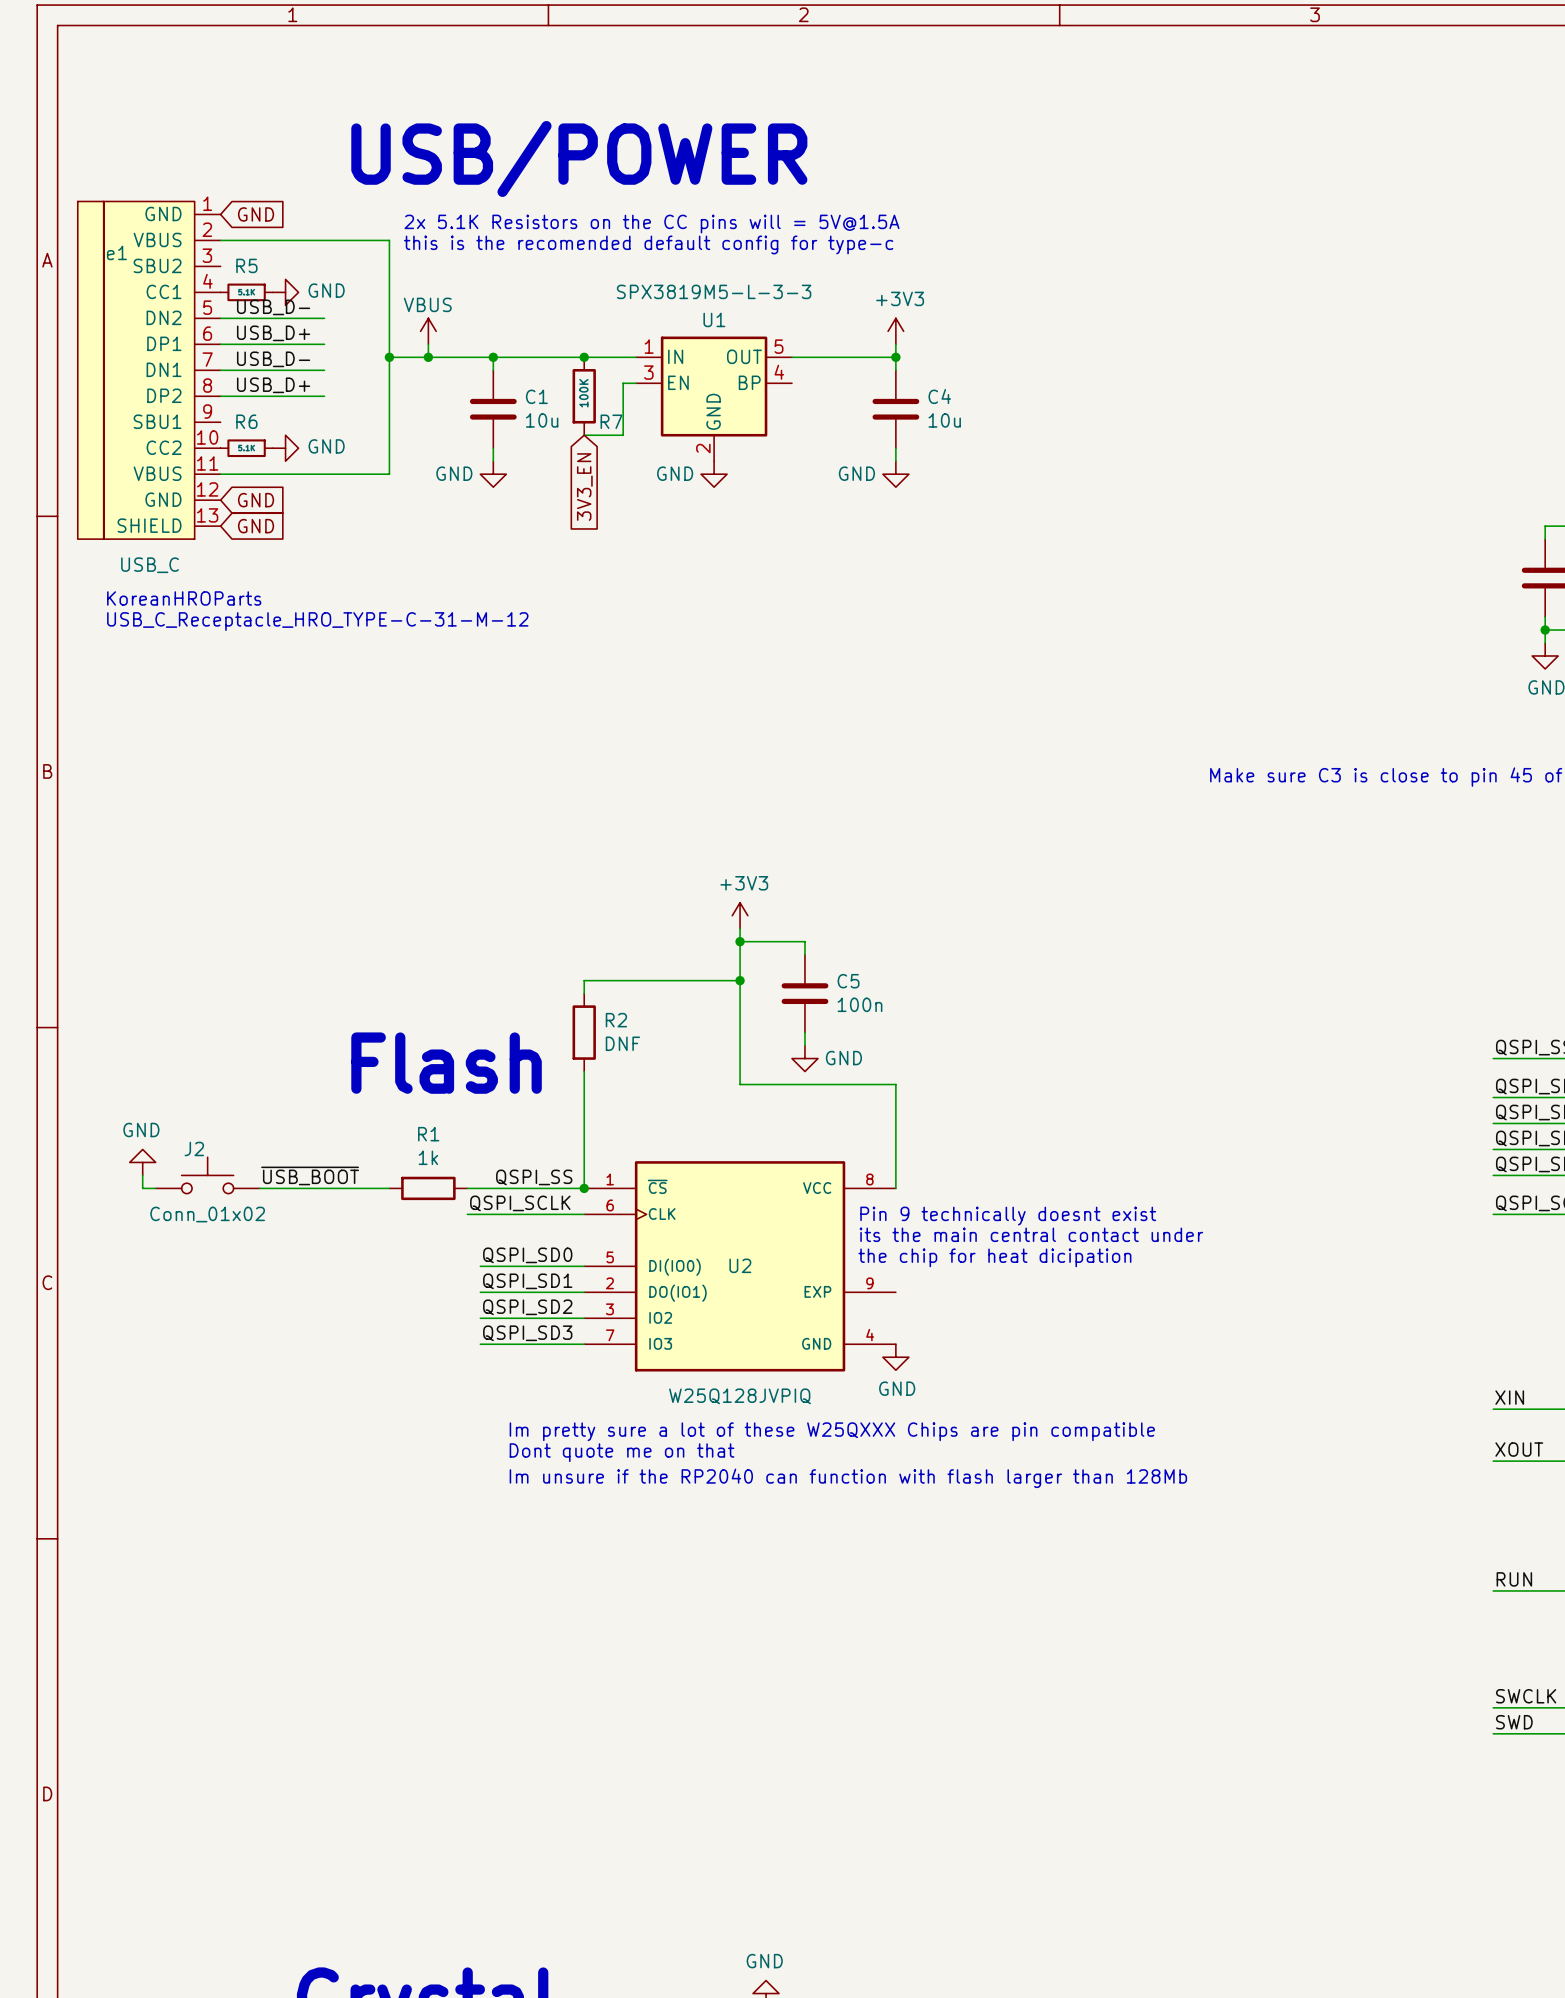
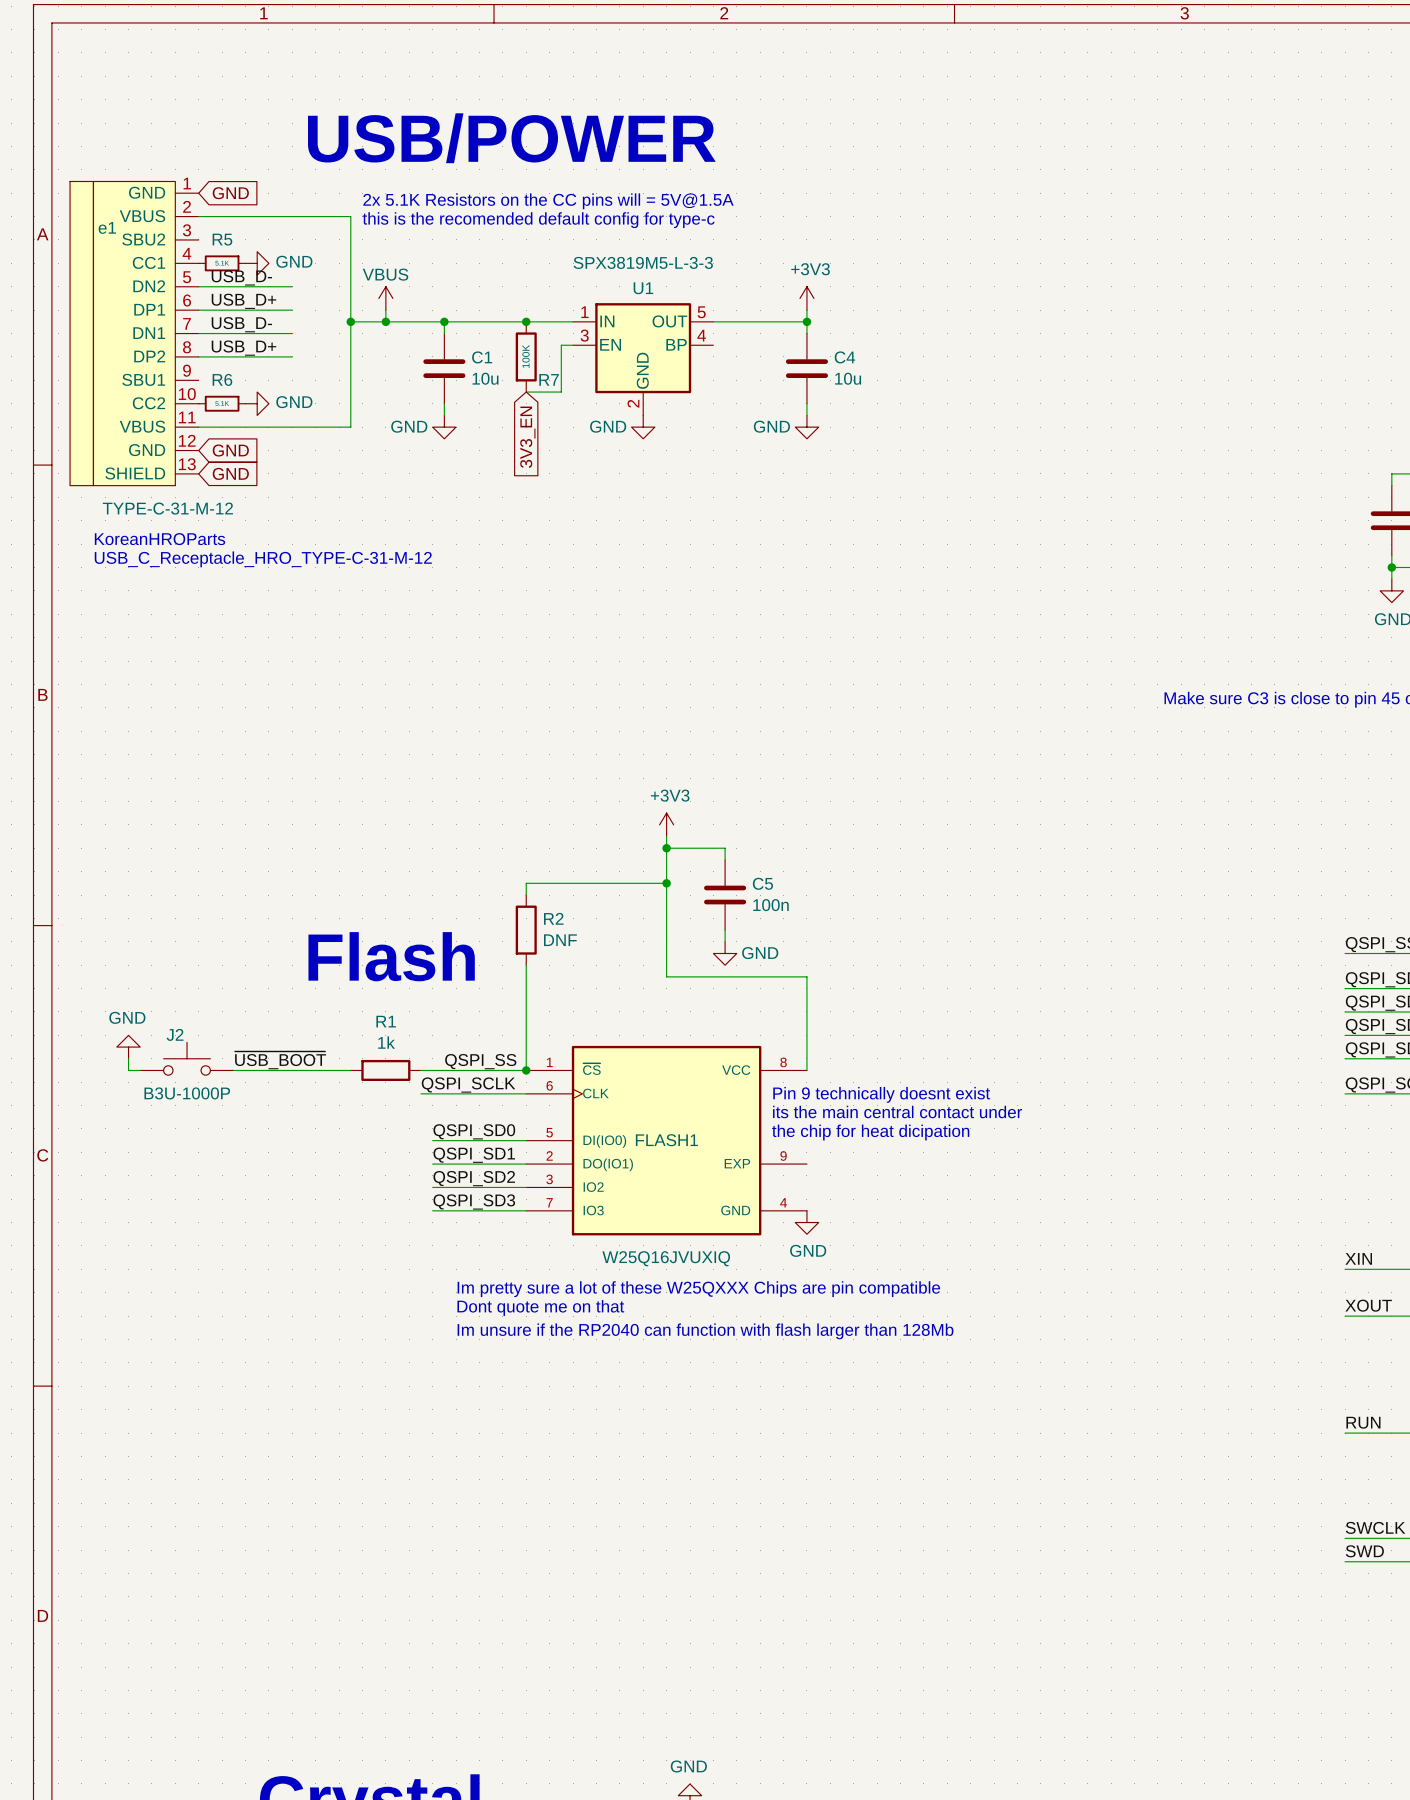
e1 value: USB_C (150, 565) -> TYPE-C-31-M-12 (167, 508)
J2 value: Conn_01x02 (207, 1214) -> B3U-1000P (187, 1093)
U2 name: U2 (740, 1265) -> FLASH1 (666, 1140)
U2 value: W25Q128JVPIQ (740, 1396) -> W25Q16JVUXIQ (666, 1258)

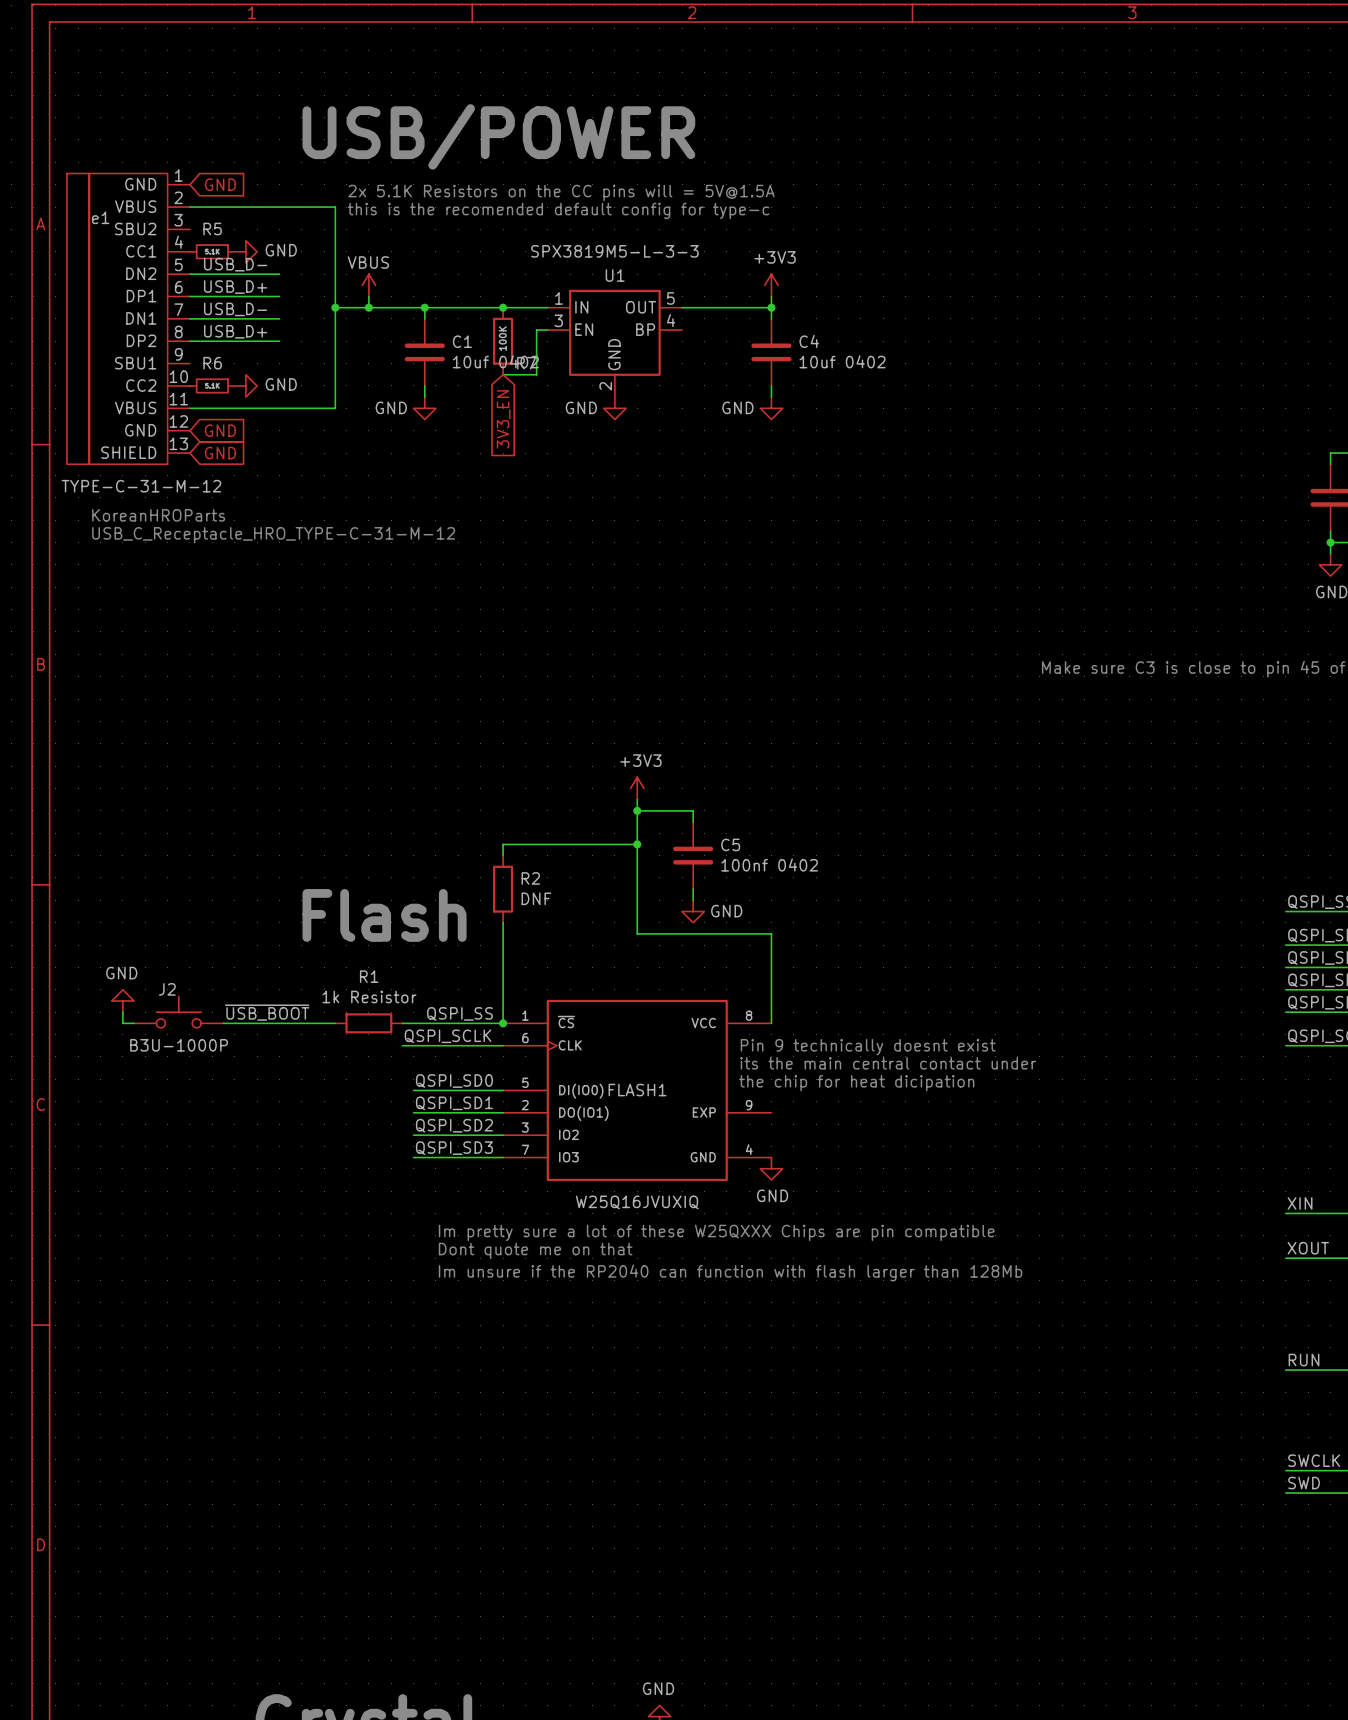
C1 value: 10u (485, 378) -> 10uf 0402 (495, 361)
C4 value: 10u (848, 378) -> 10uf 0402 (842, 361)
C5 value: 100n (771, 905) -> 100nf 0402 (769, 865)
R1 value: 1k (386, 1042) -> 1k Resistor (369, 997)

